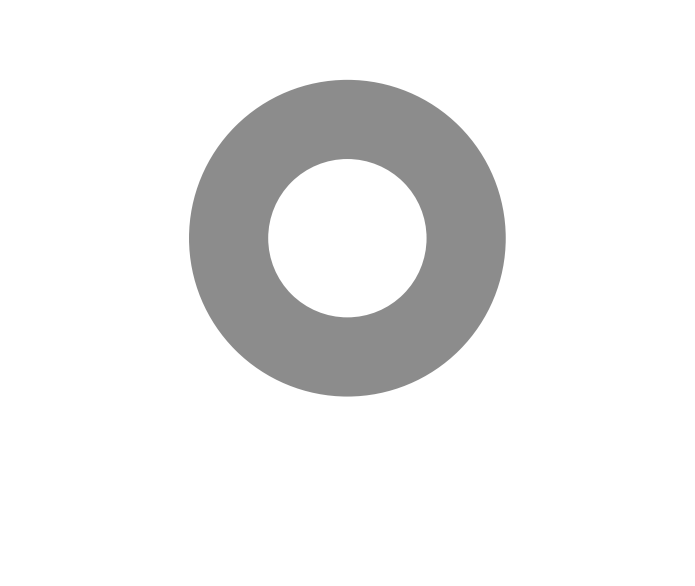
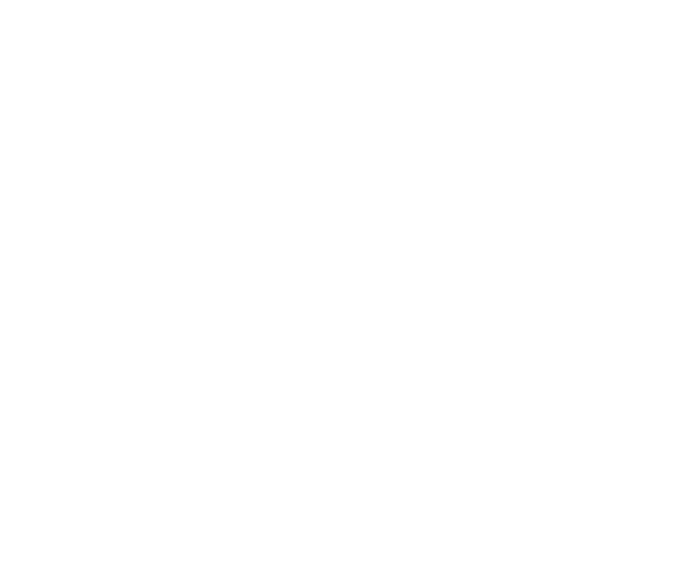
part: (347, 238) -> none

